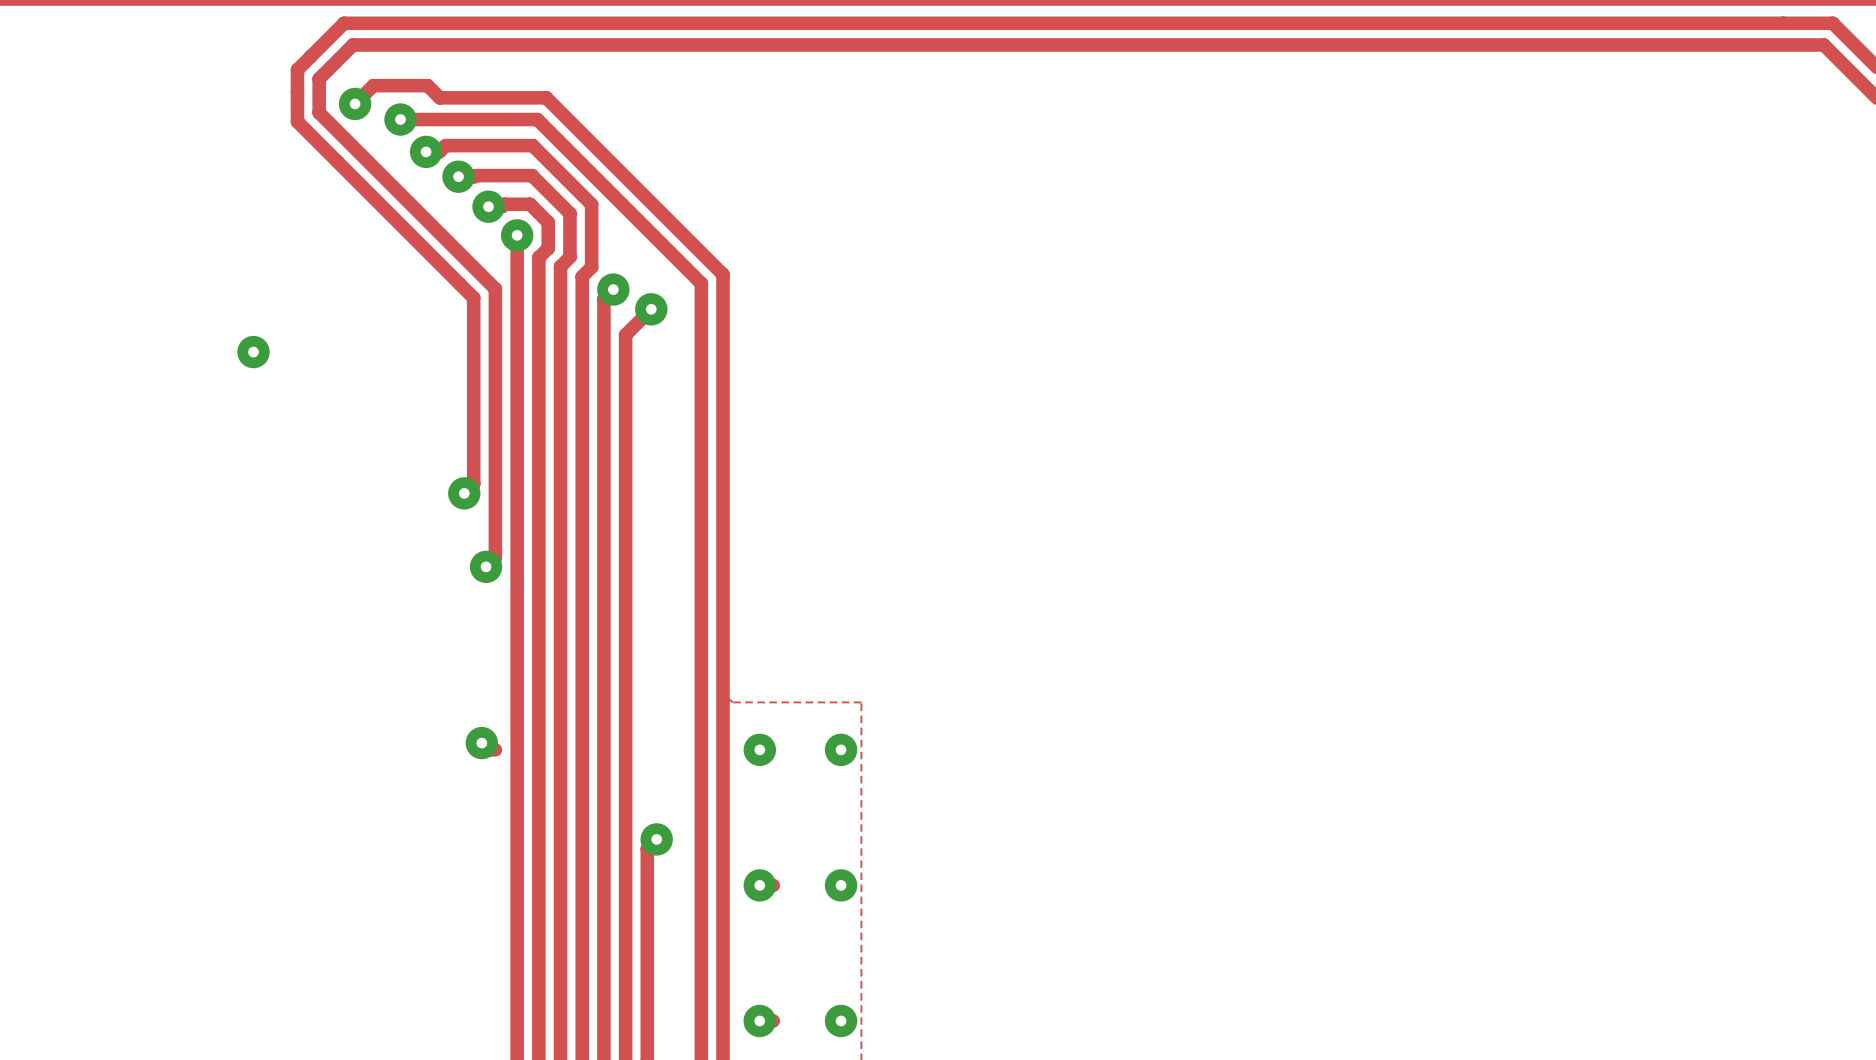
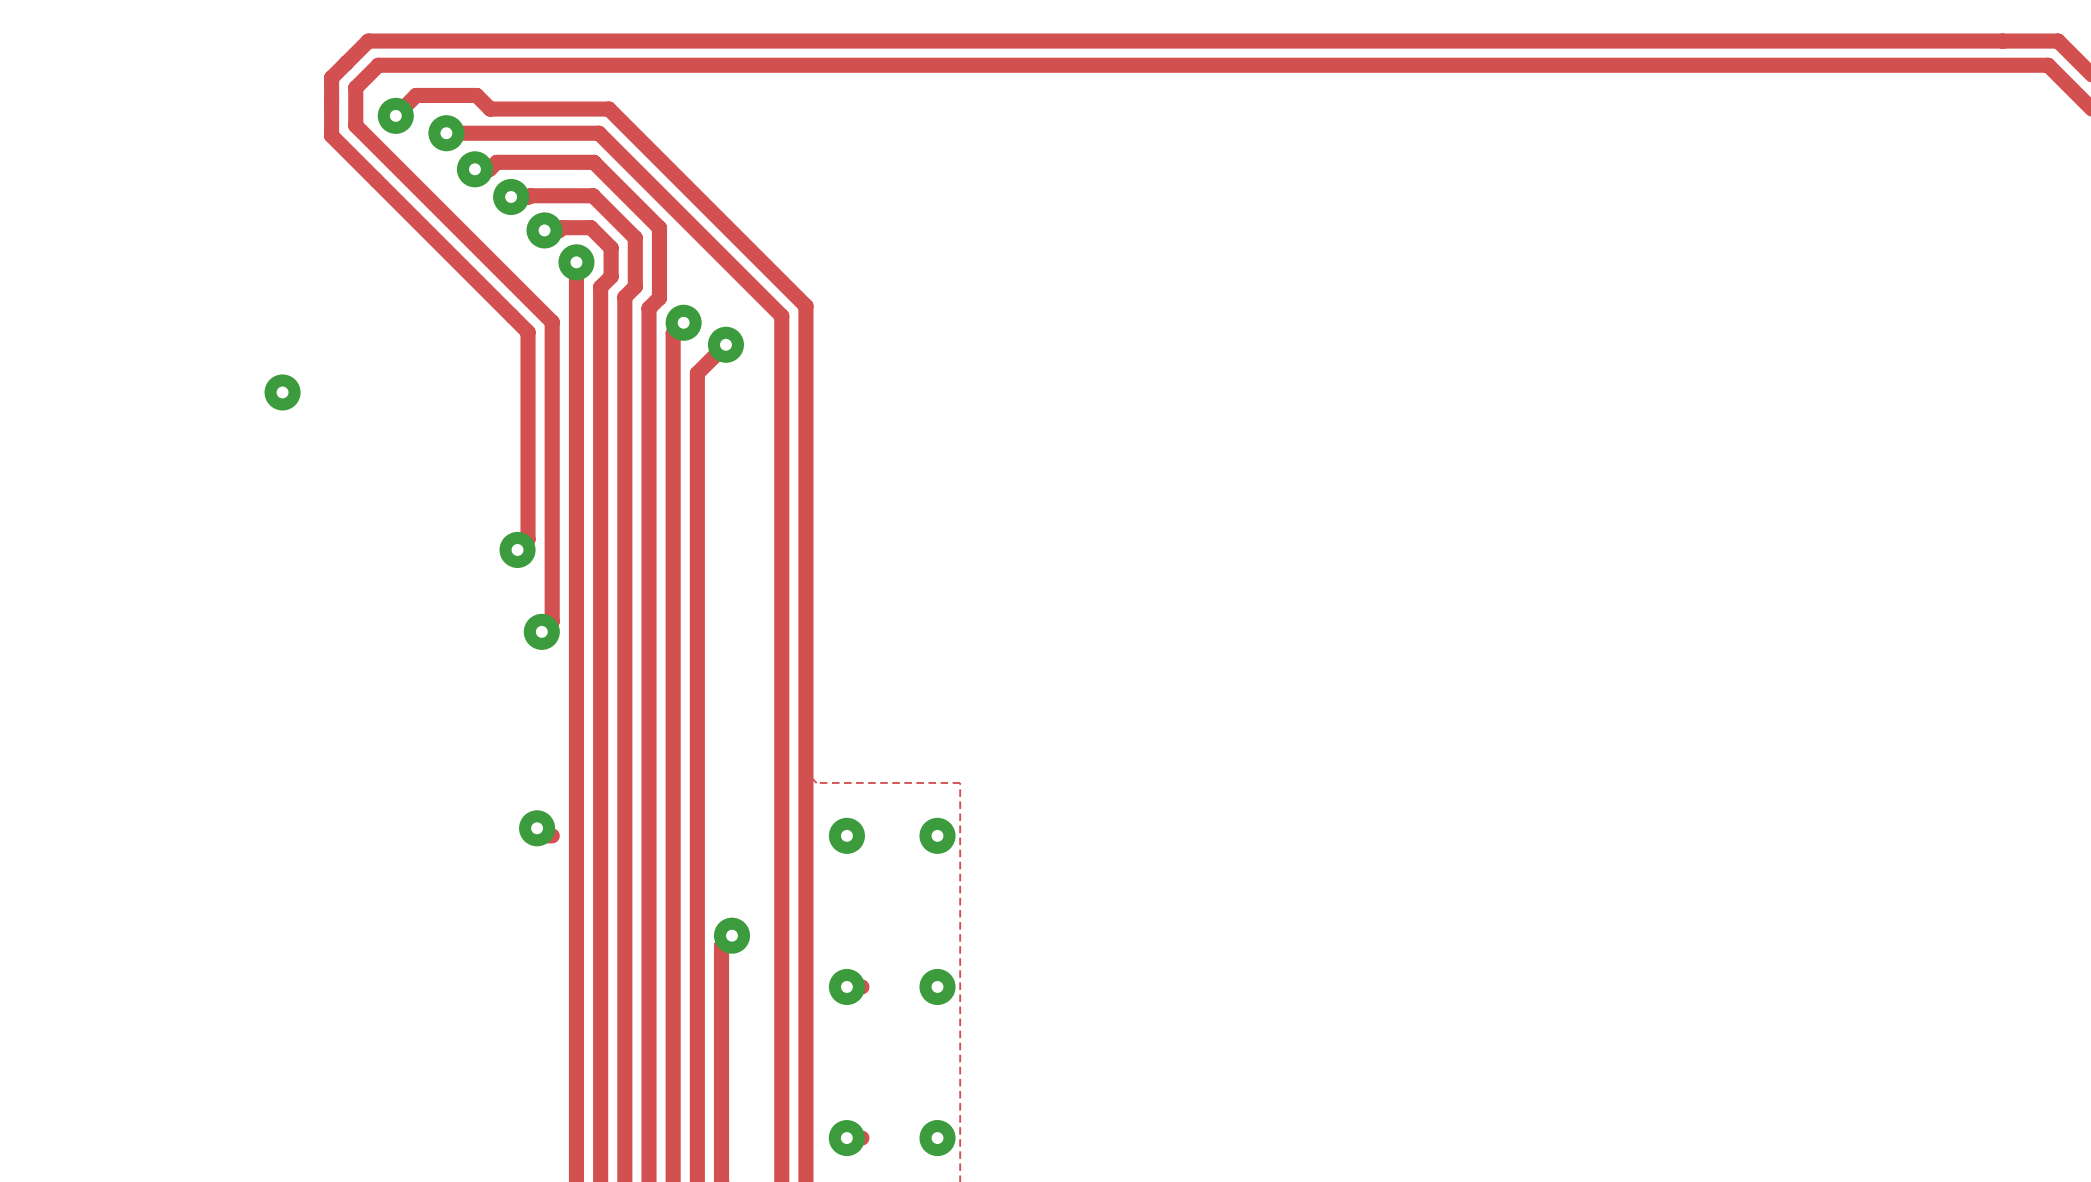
track: (330, 36) (344, 23) (1832, 23) (1846, 36) -> (368, 41) (2058, 41)
track: (339, 58) (353, 44) (1823, 44) (1837, 58) -> (378, 65) (2048, 65)

